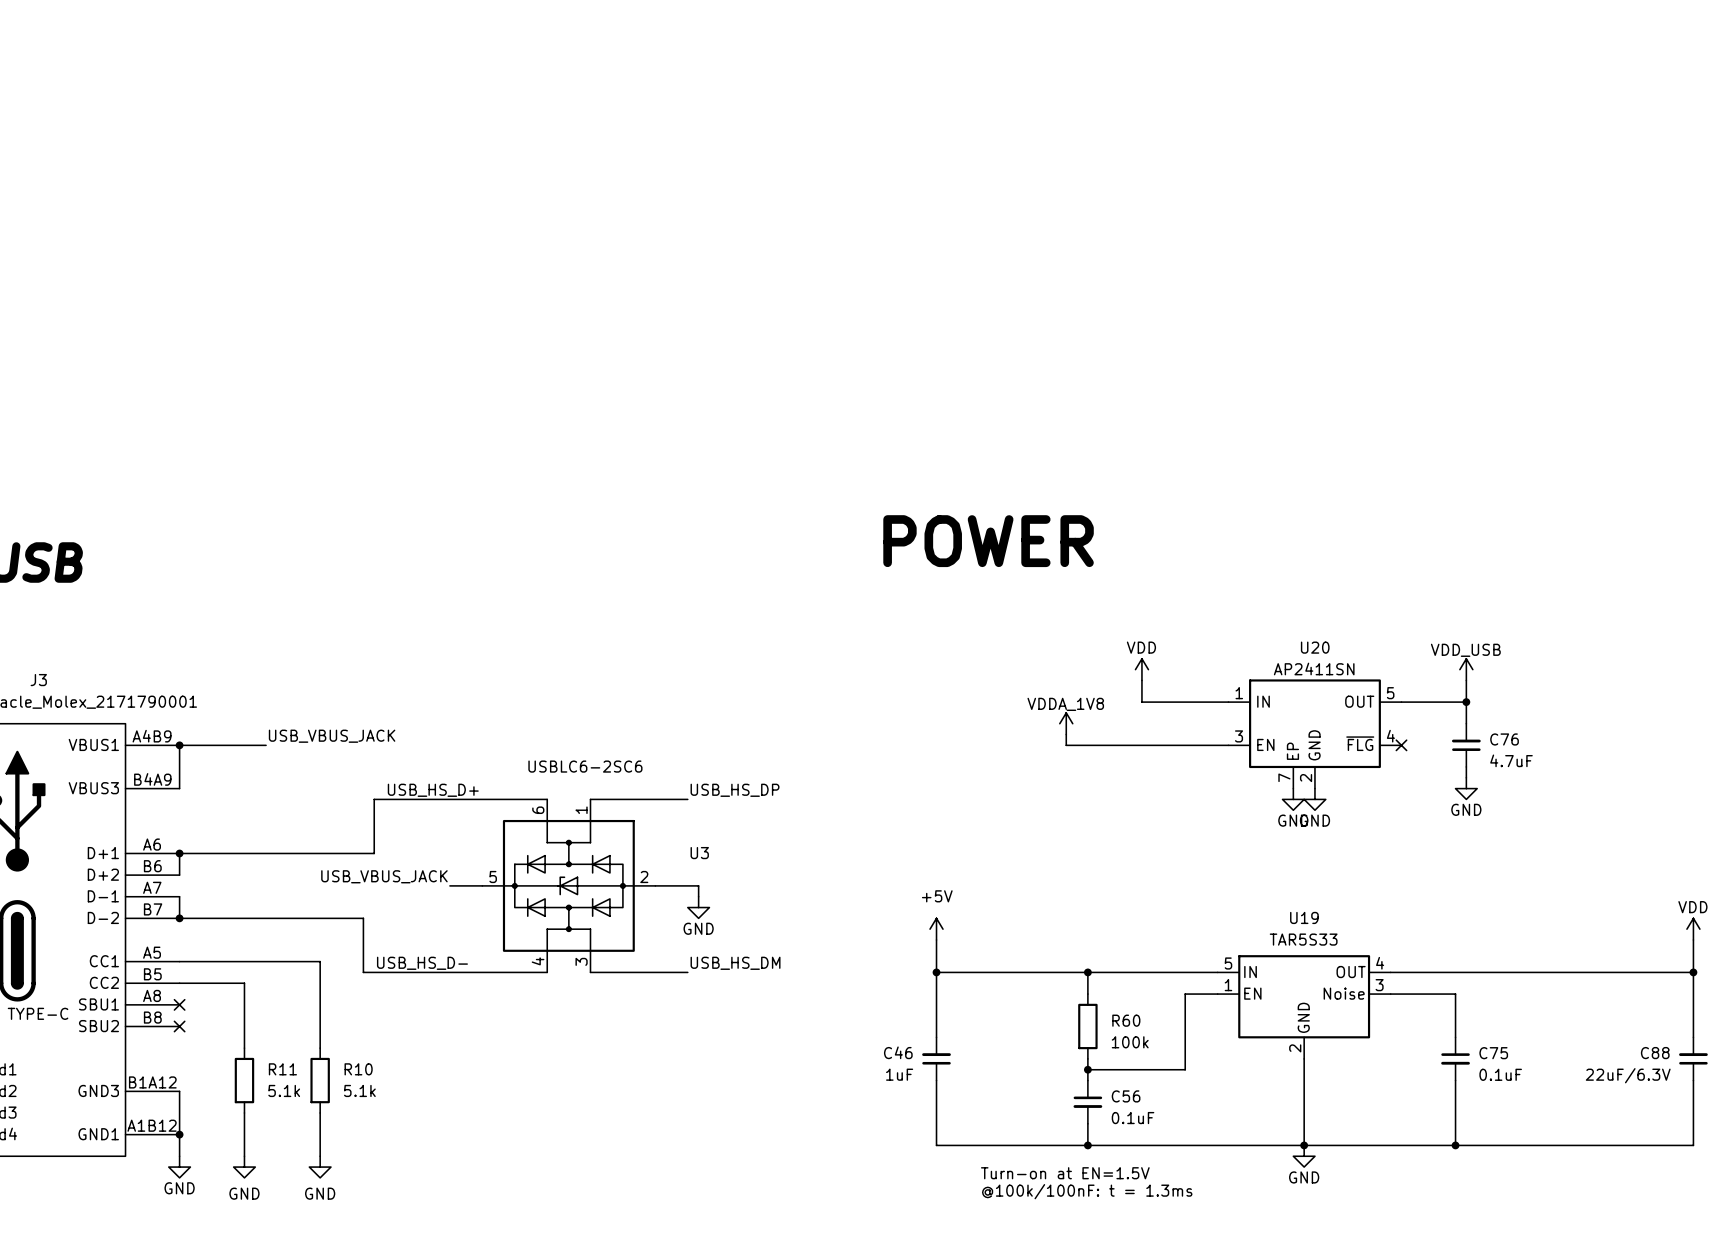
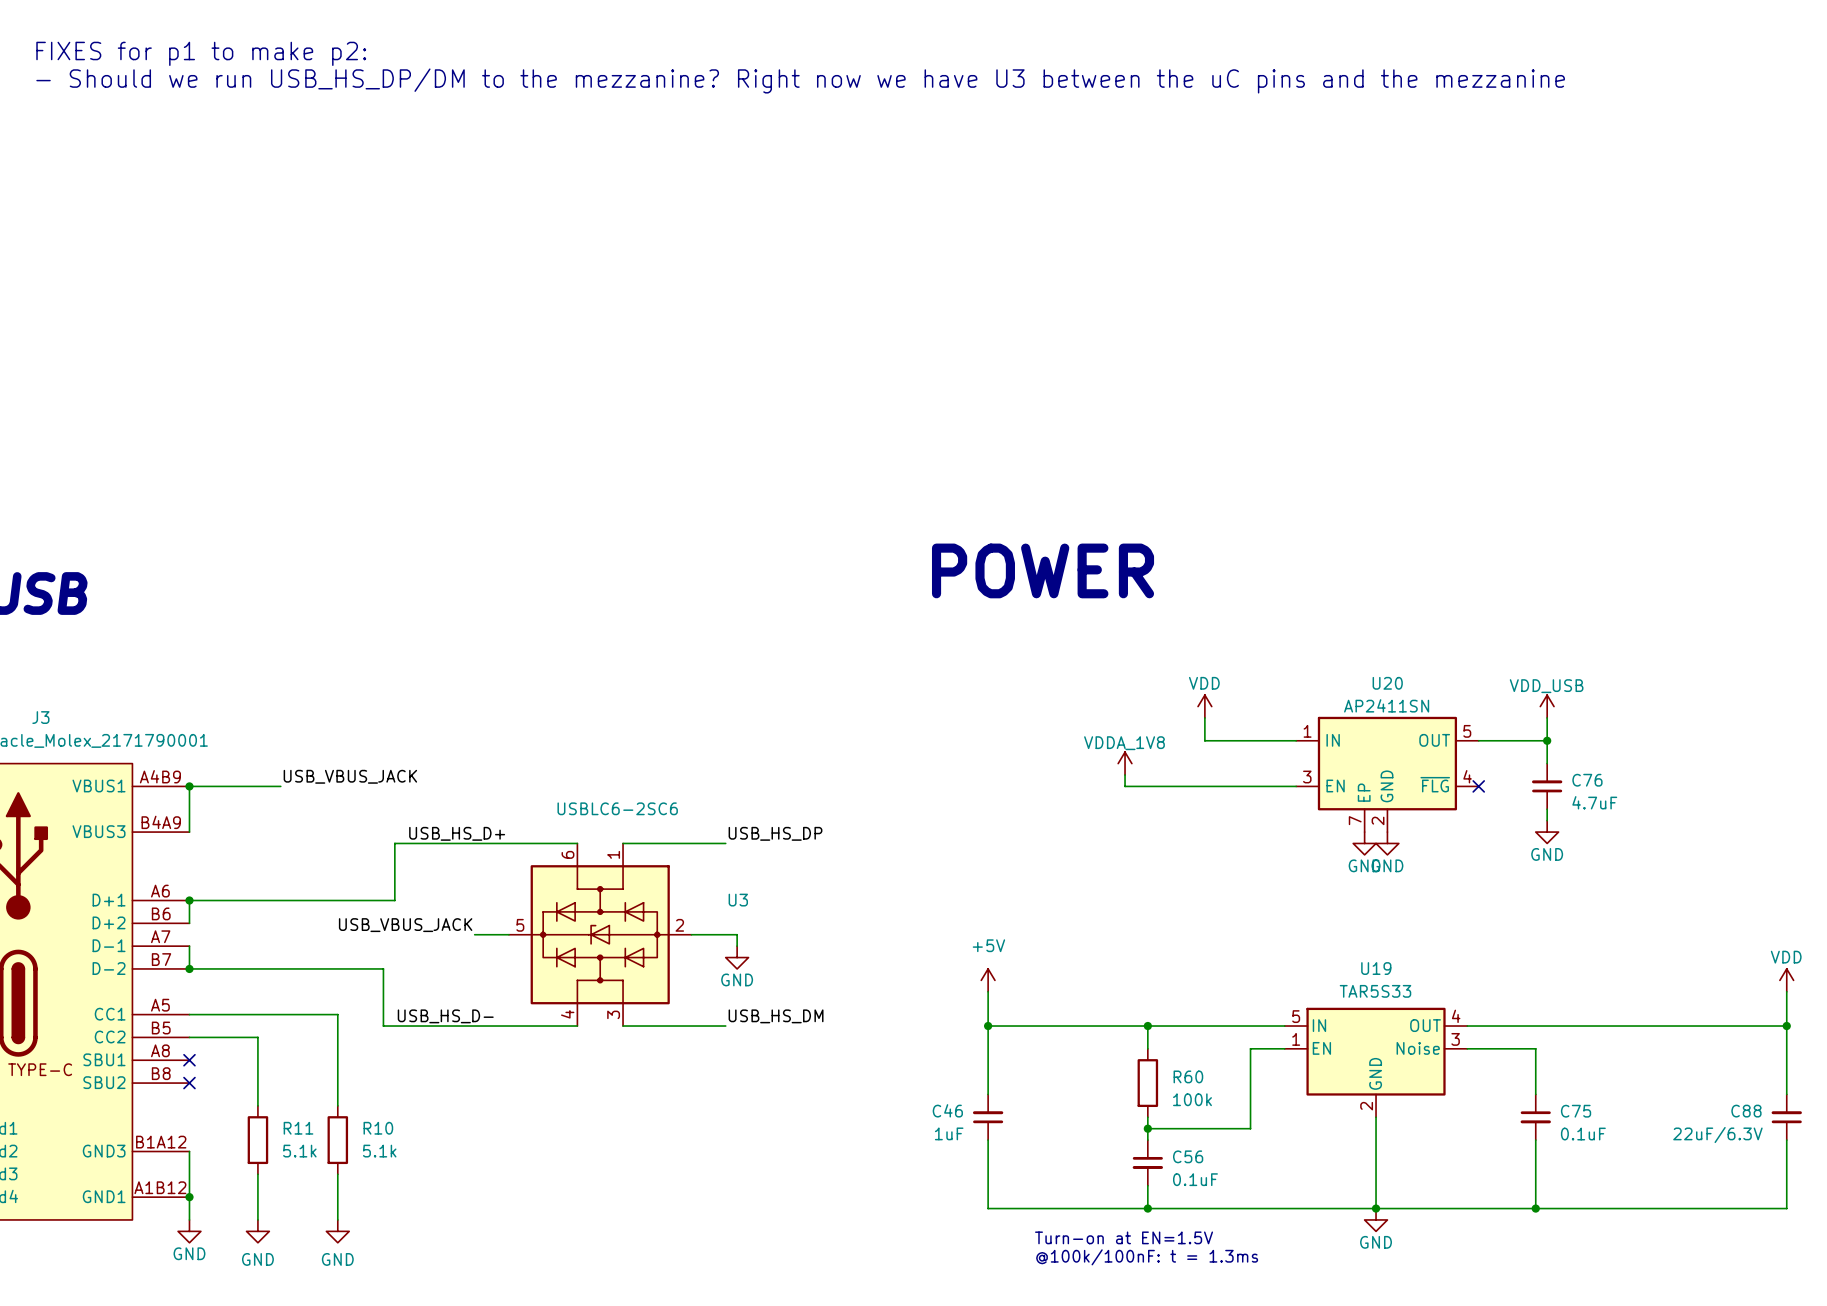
text: none -> FIXES for p1 to make p2: (201, 53)
text: none -> - Should we run USB_HS_DP/DM to the mezzanine? Right now we have U3 between the uC pins and the mezzanine (800, 80)

